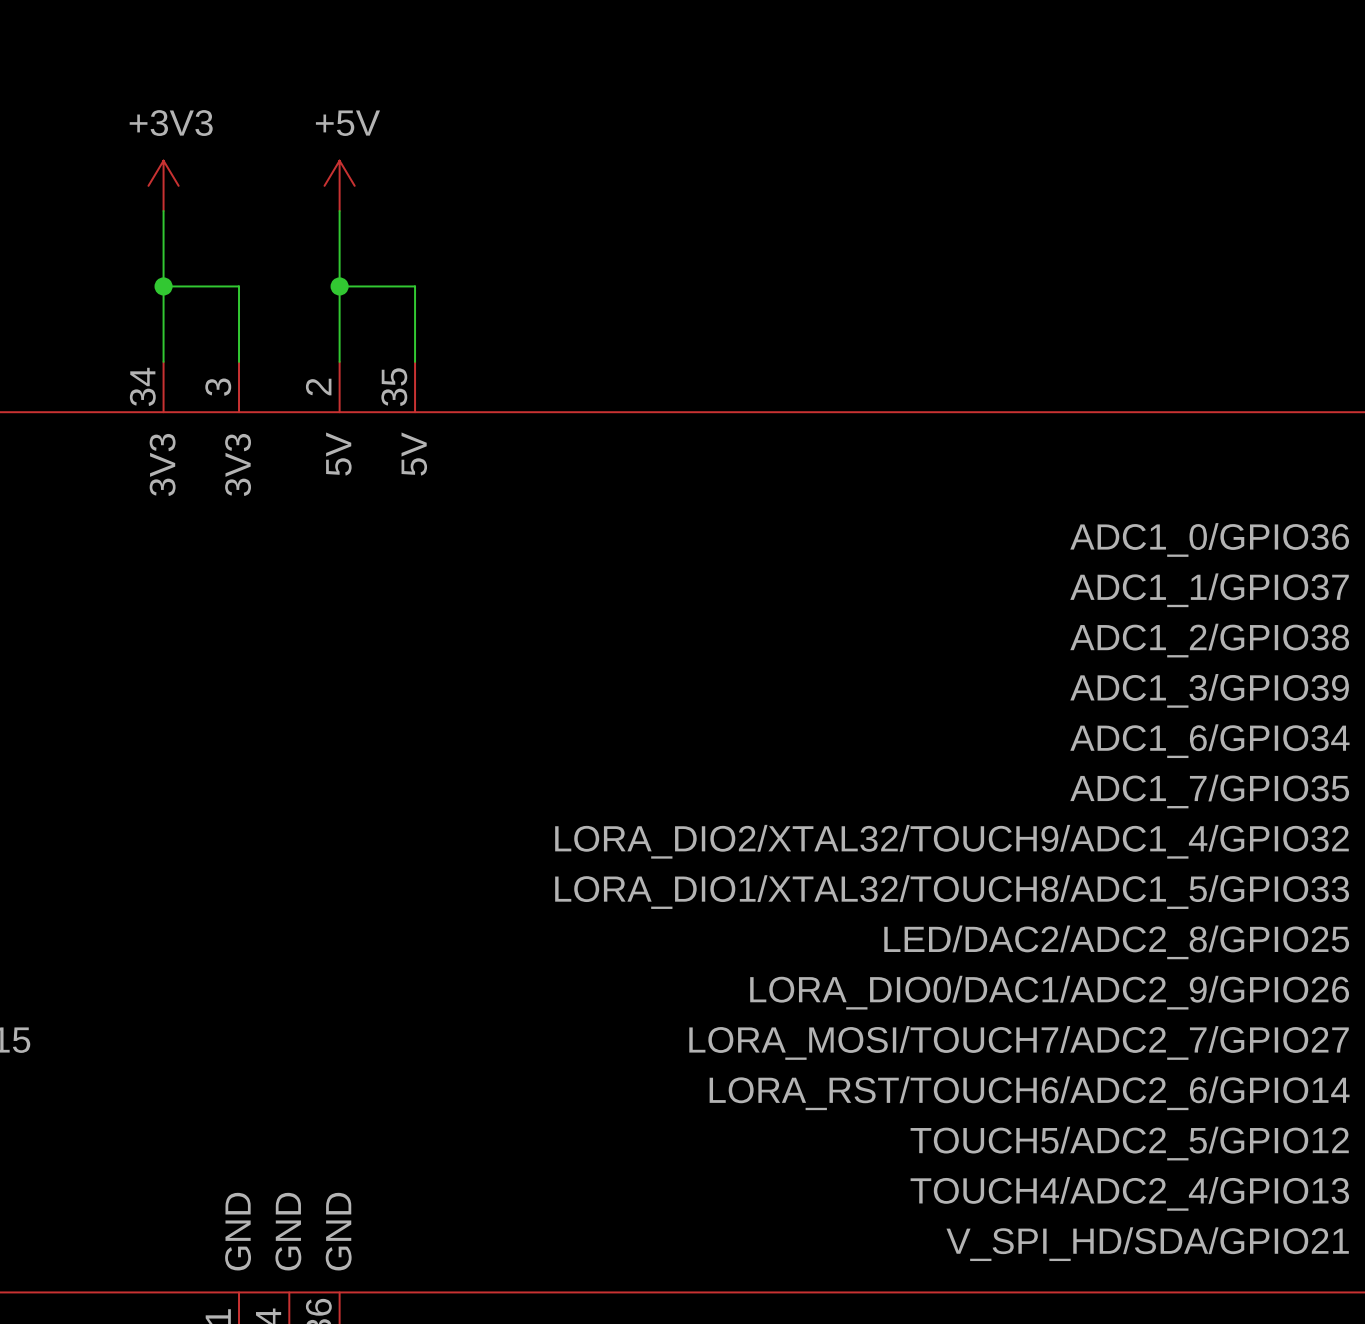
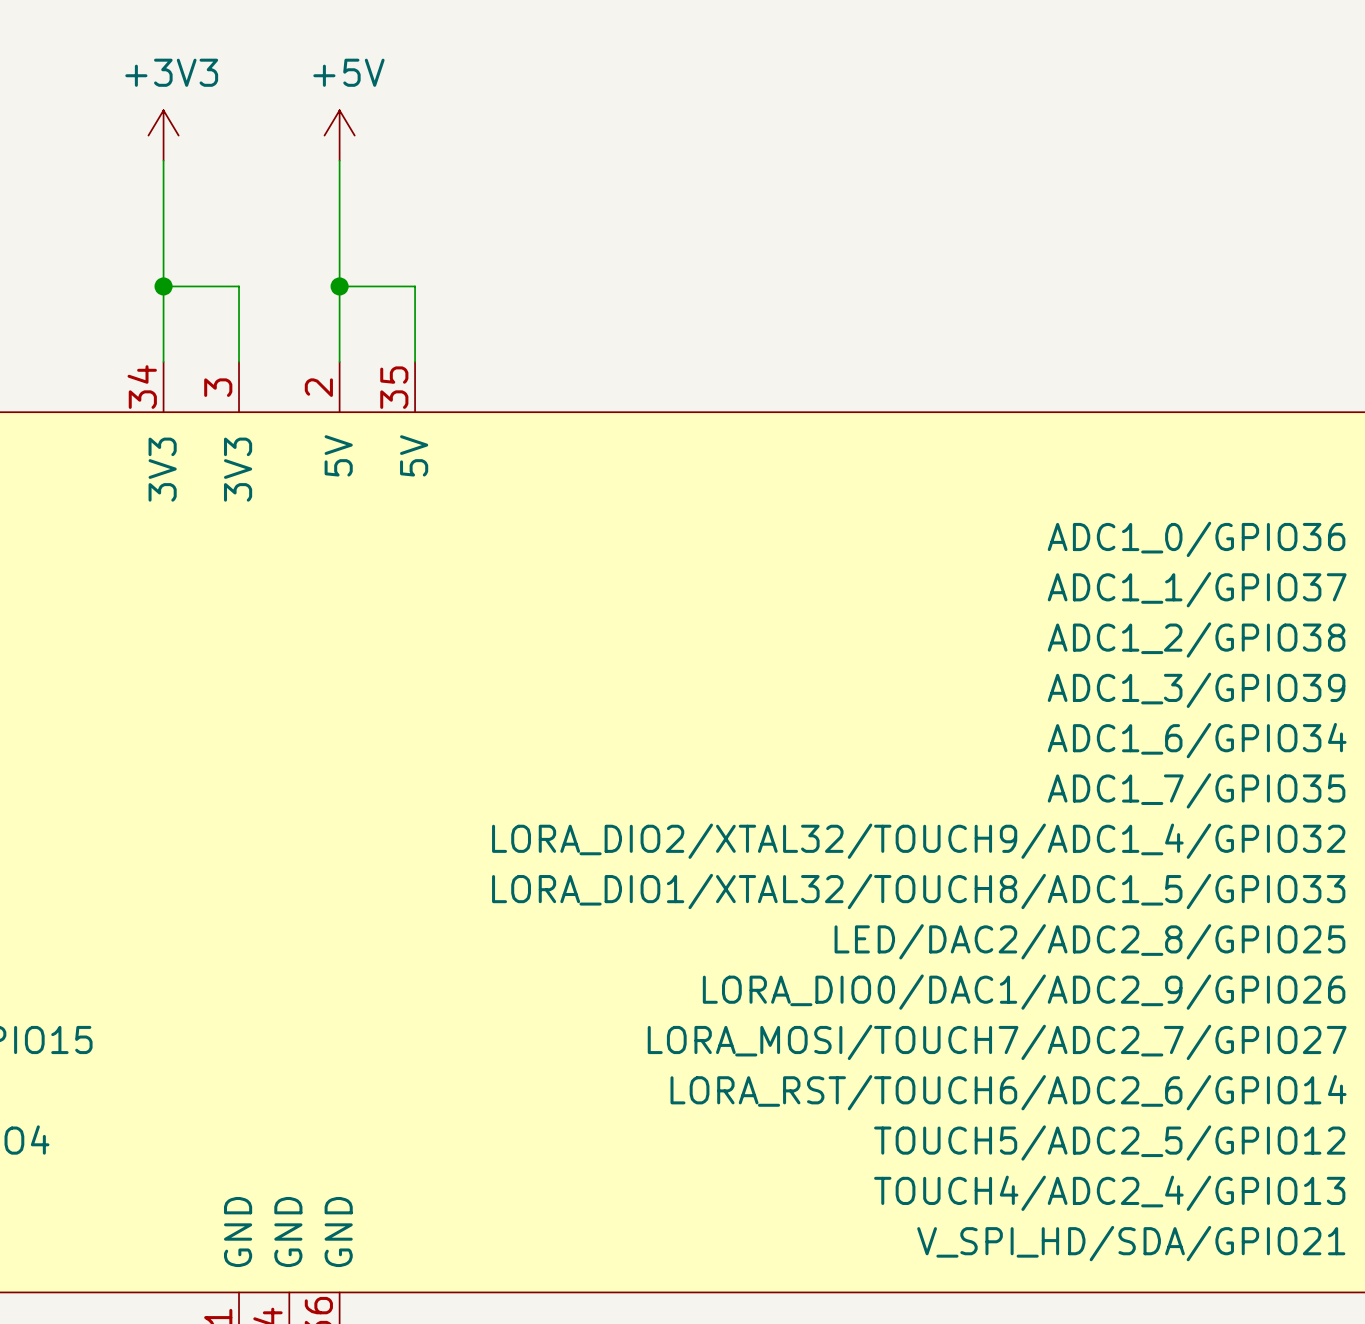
power symbol position: +3V3 (163, 185) -> +3V3 (163, 135)
power symbol position: +5V (339, 185) -> +5V (339, 135)

